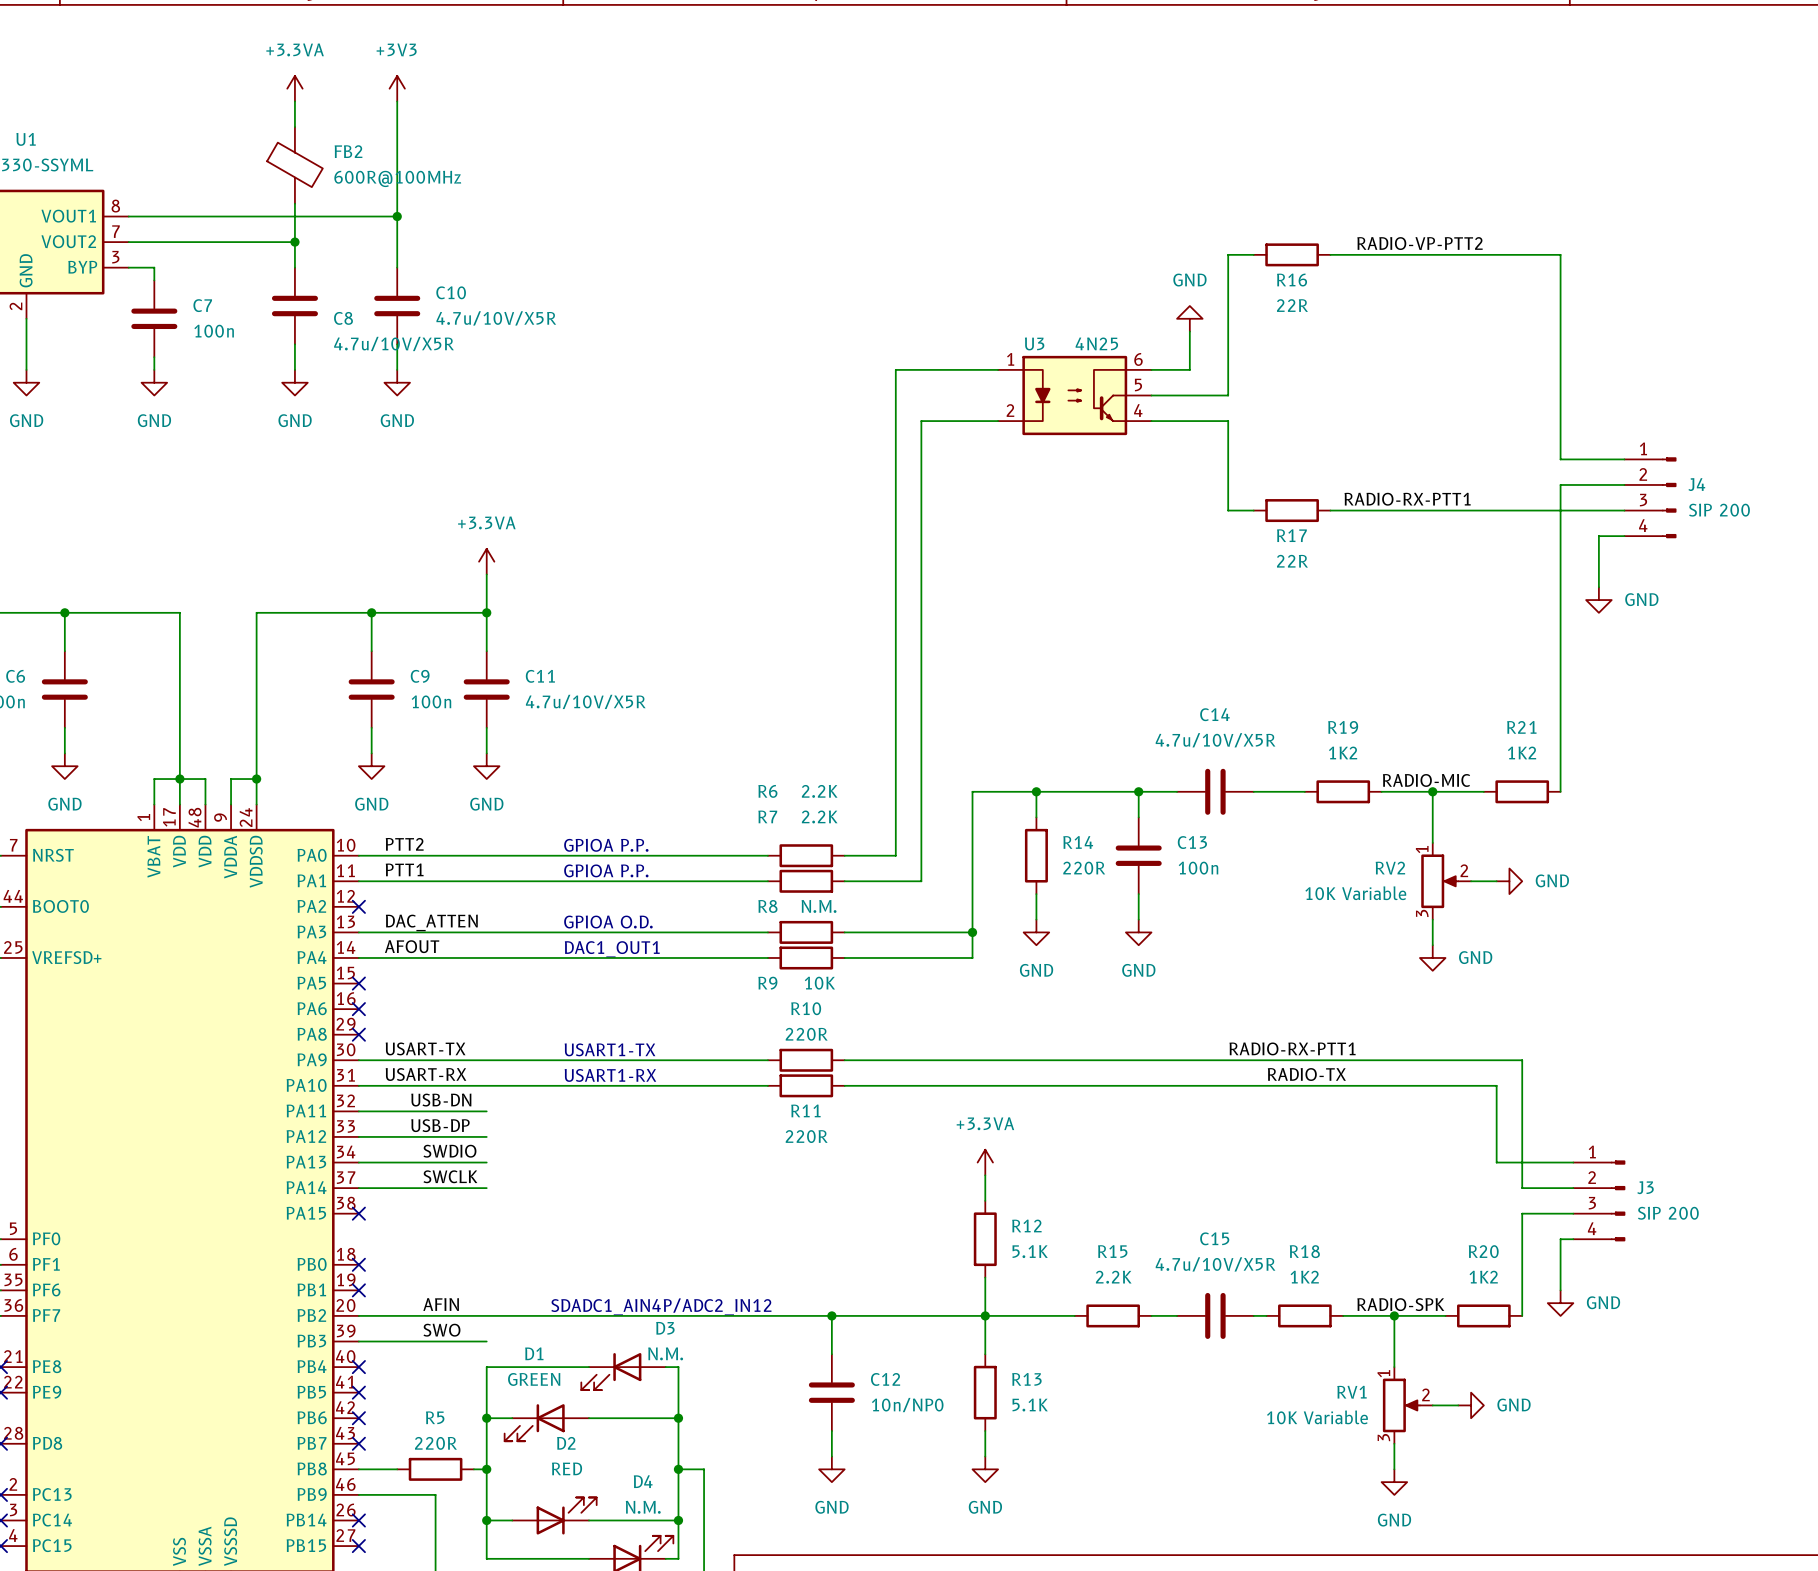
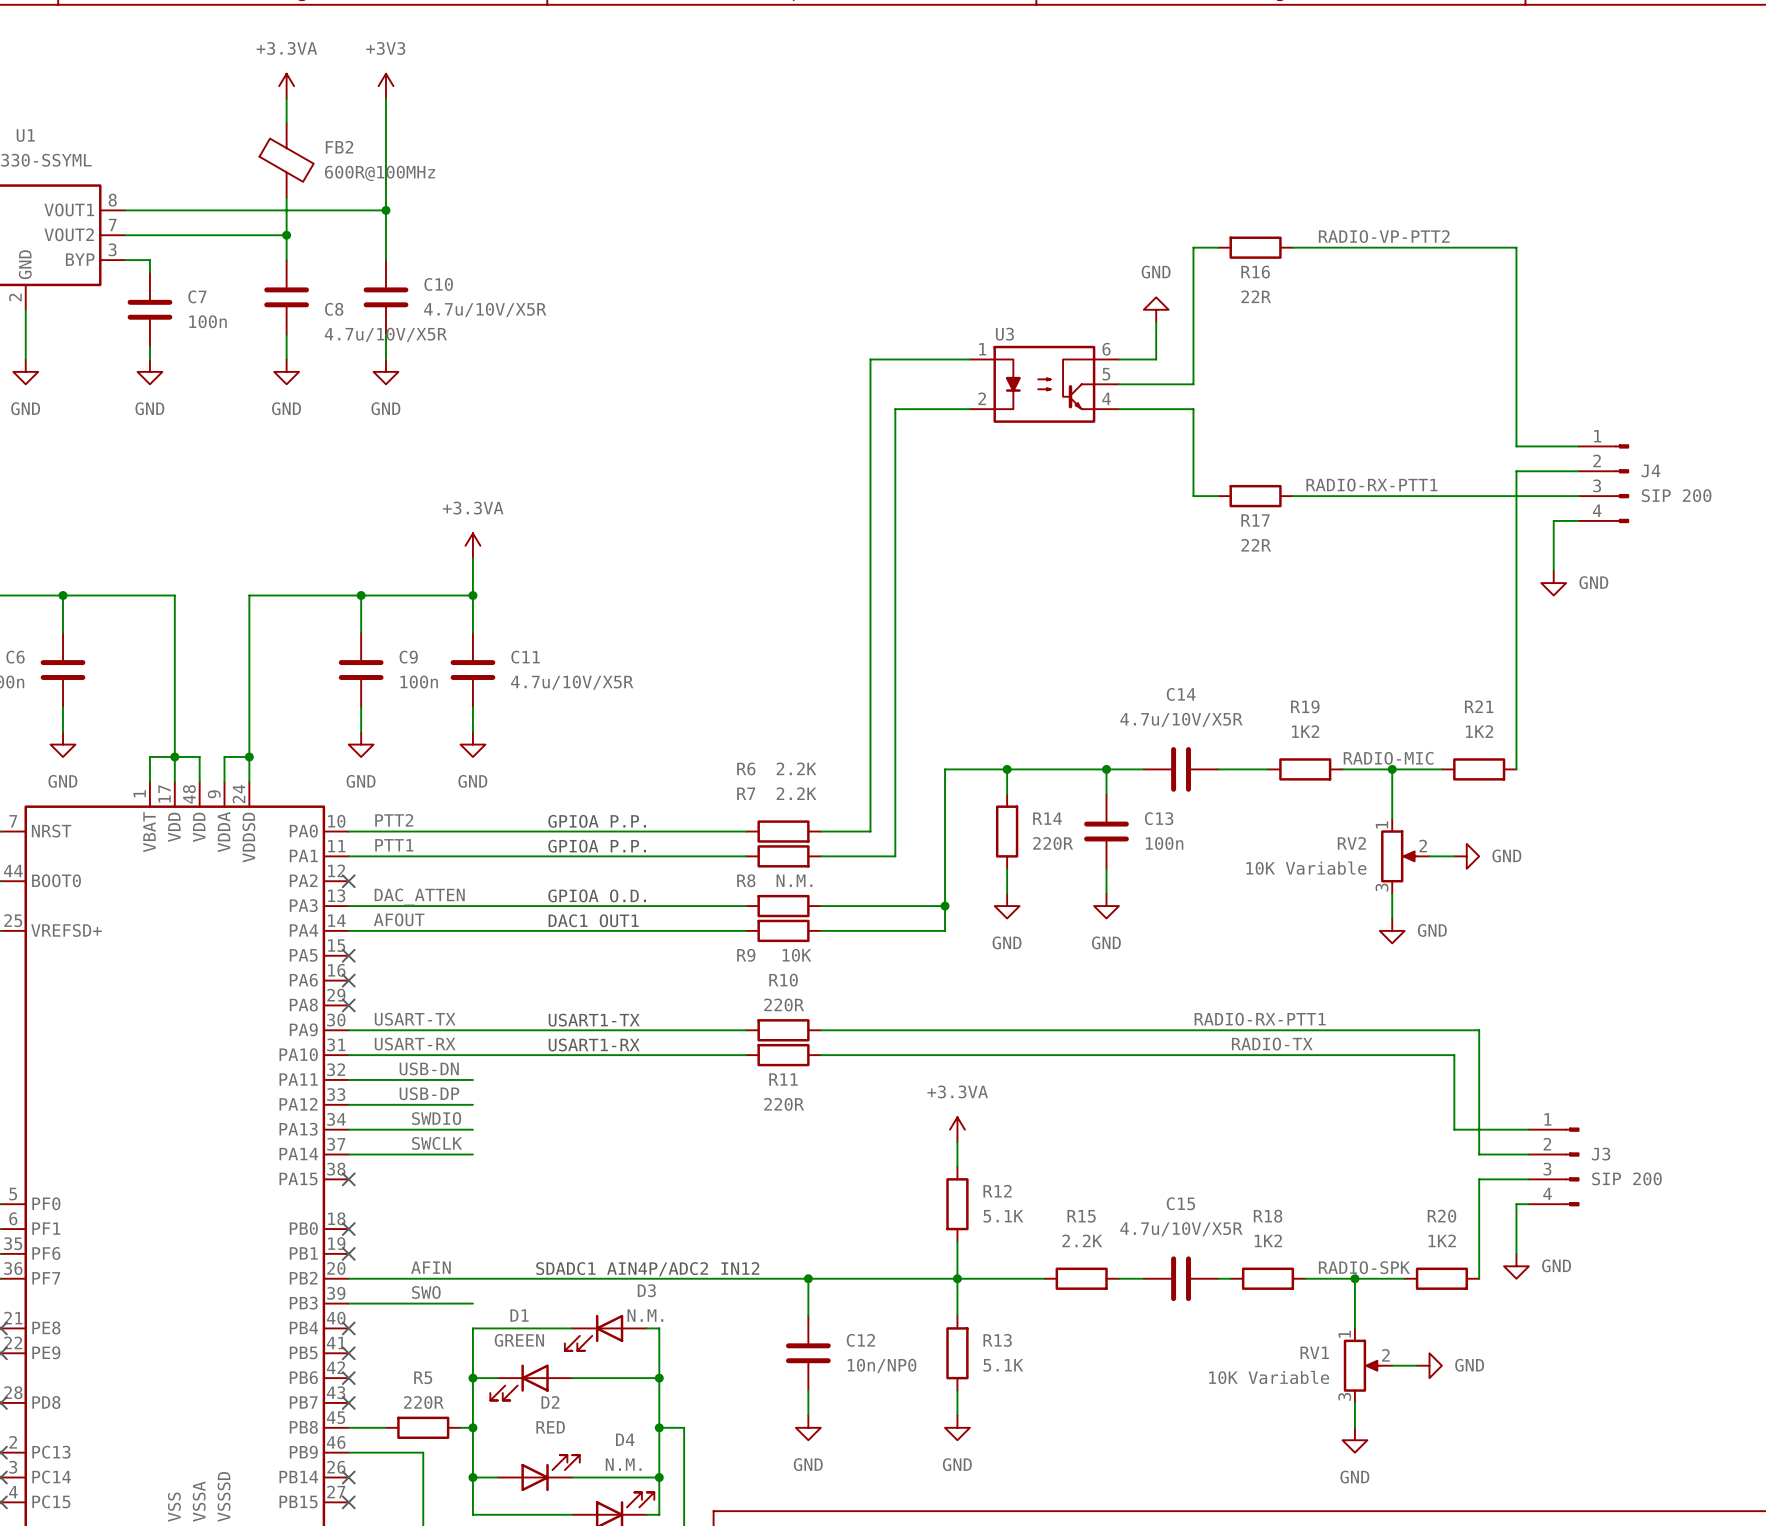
U3 value: 4N25 (1096, 343) -> none

